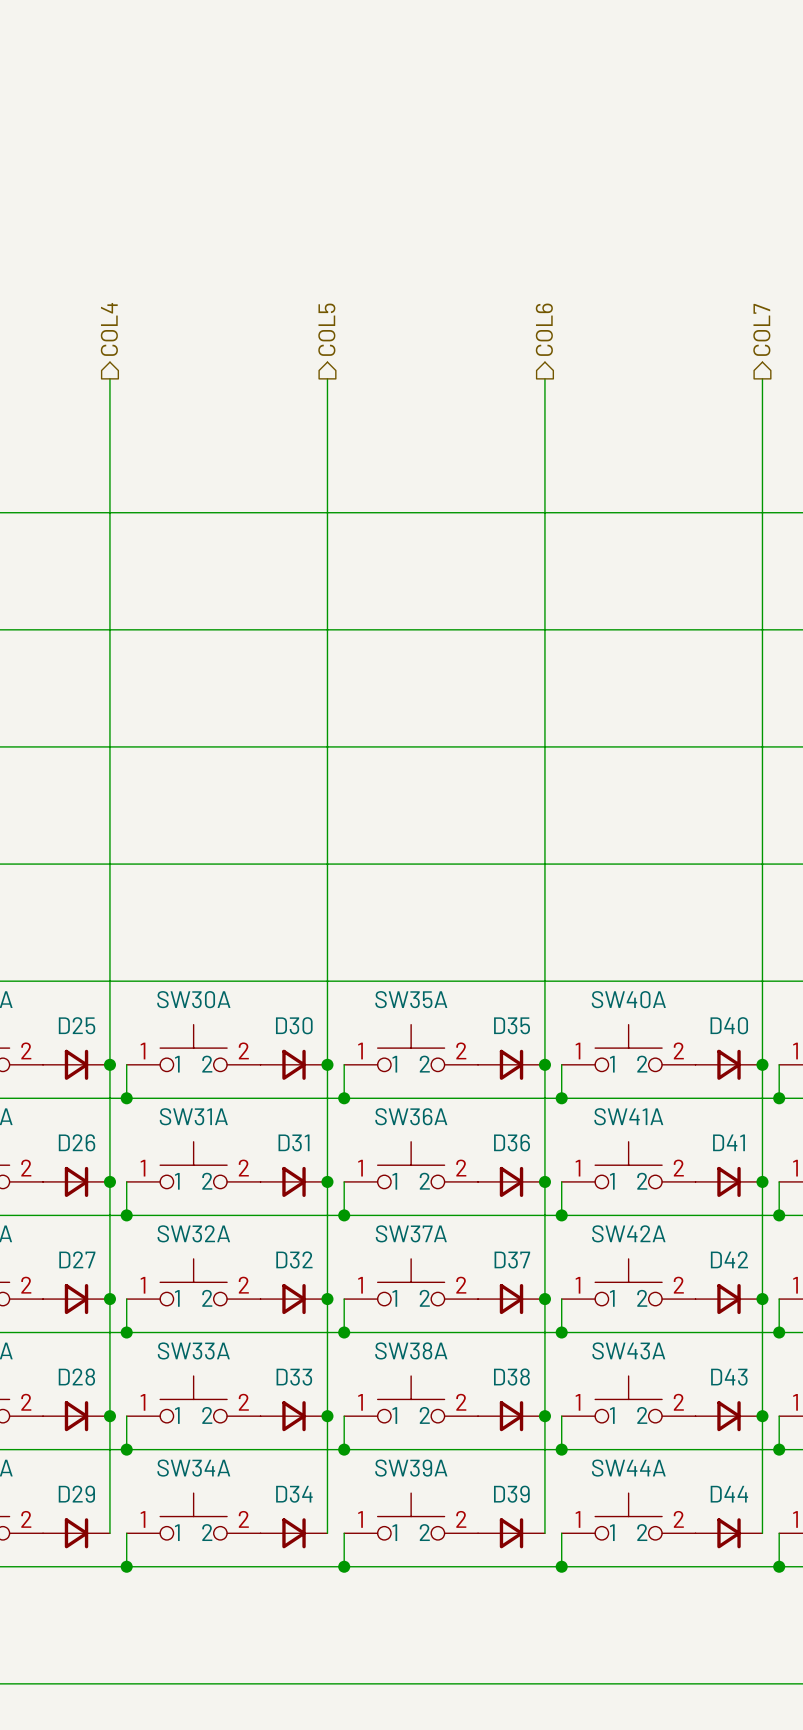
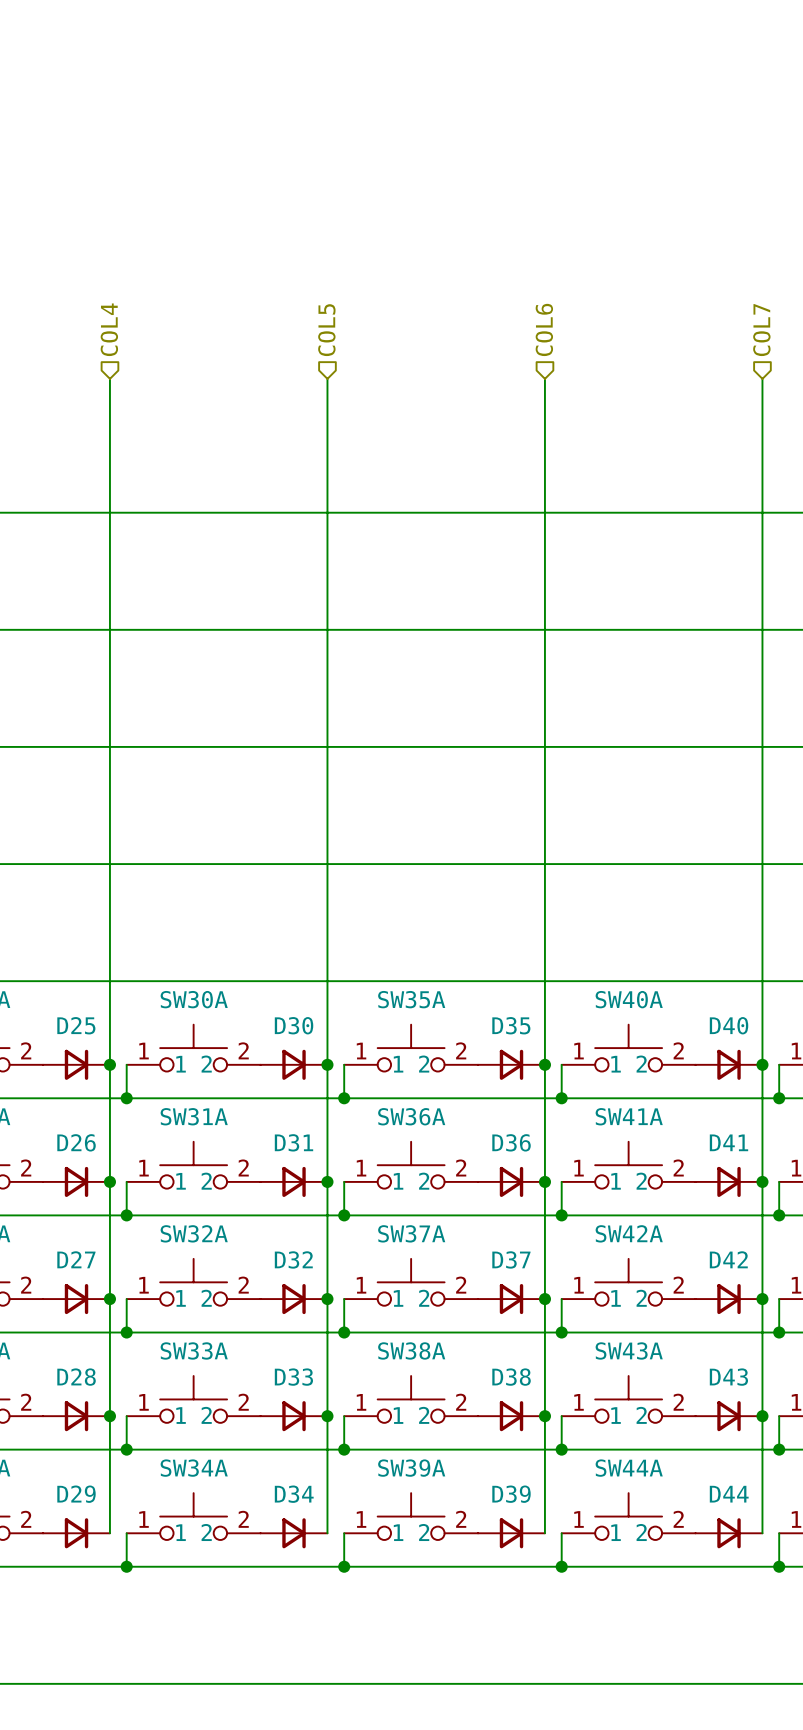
hierarchical label shape: output (109, 329) -> input (109, 329)
hierarchical label shape: output (326, 329) -> input (326, 330)
hierarchical label shape: output (544, 329) -> input (544, 329)
hierarchical label shape: output (761, 329) -> input (761, 330)

